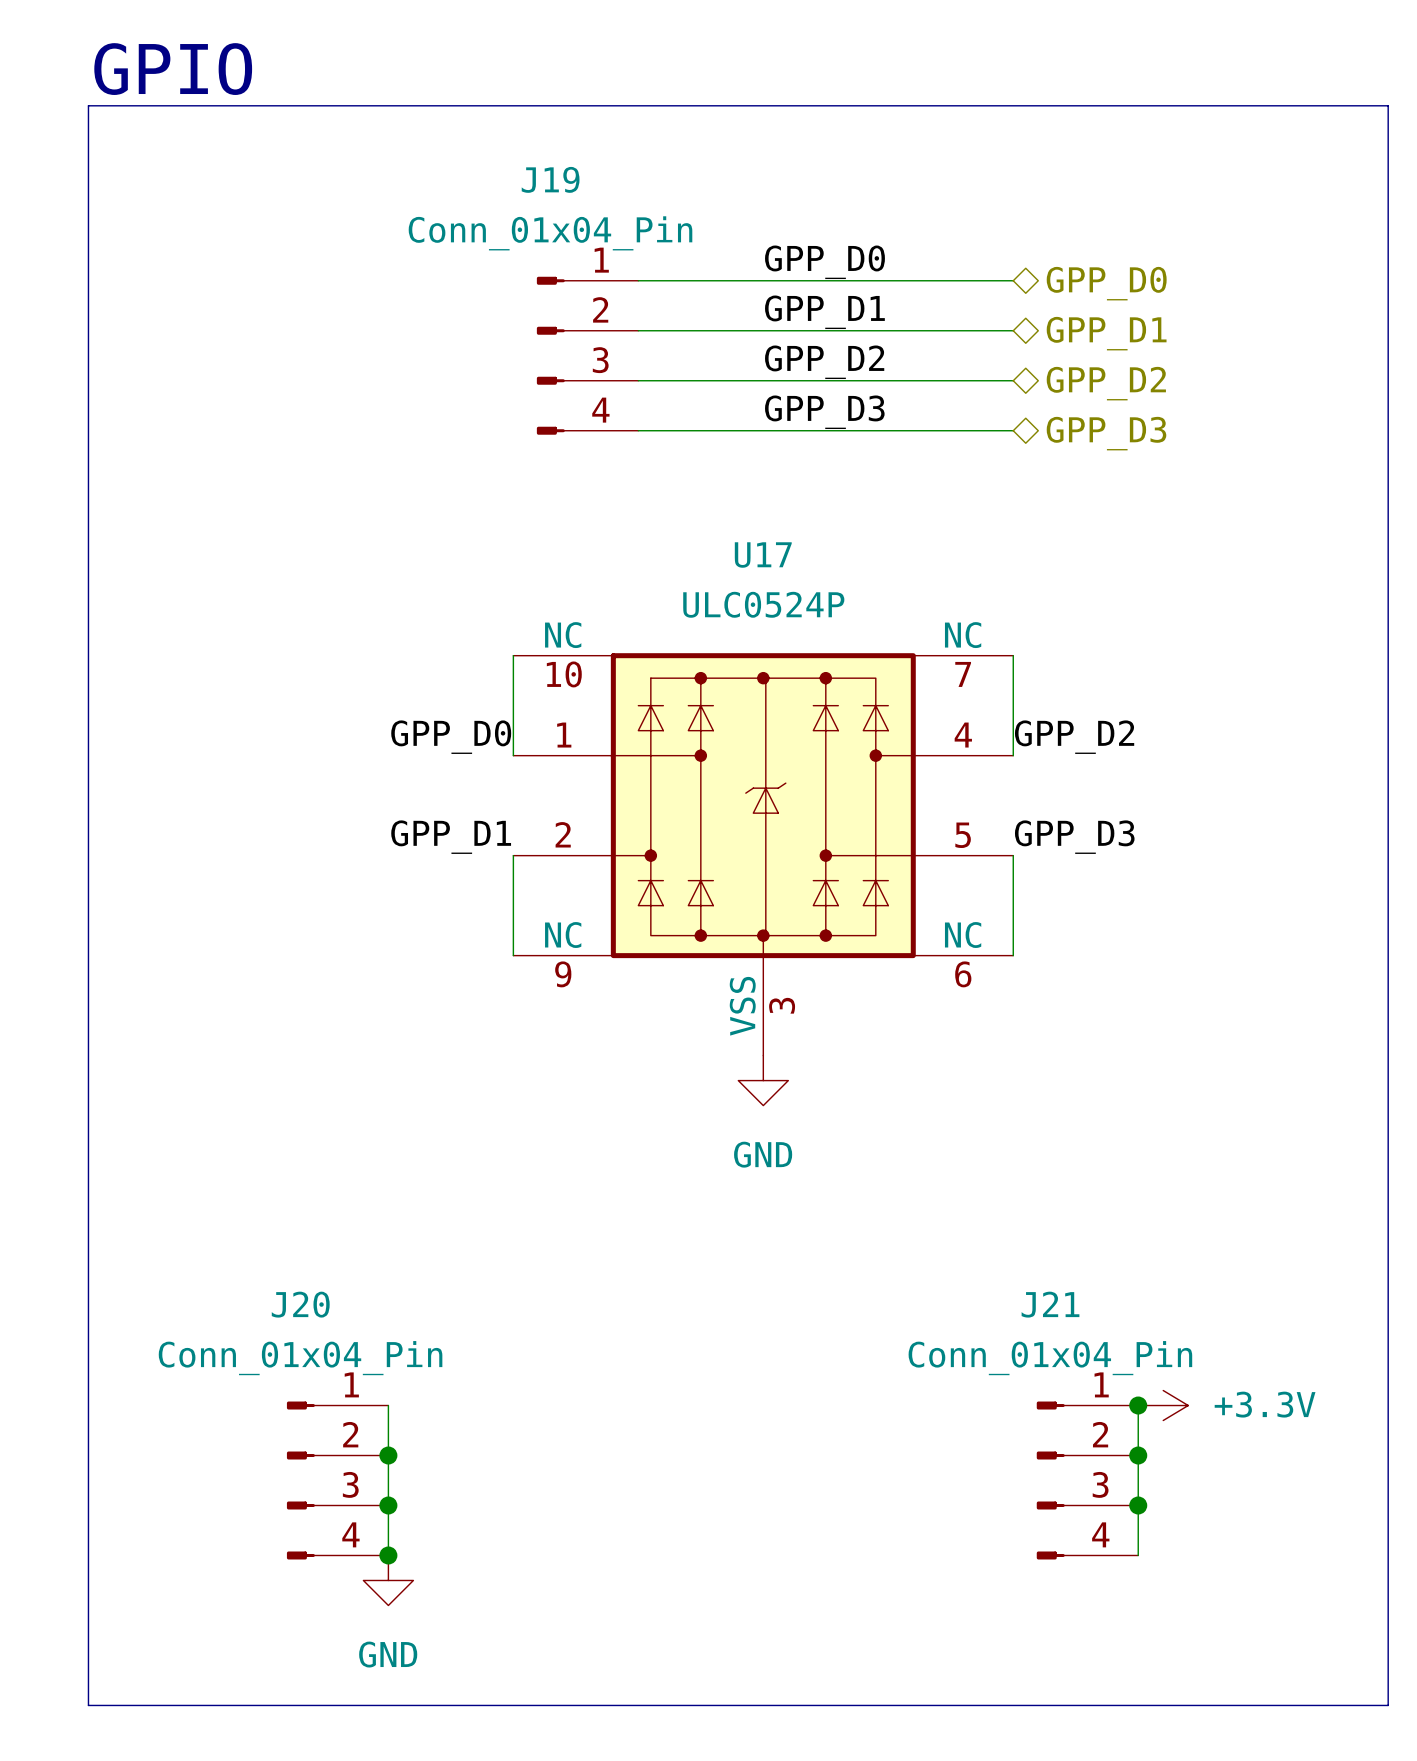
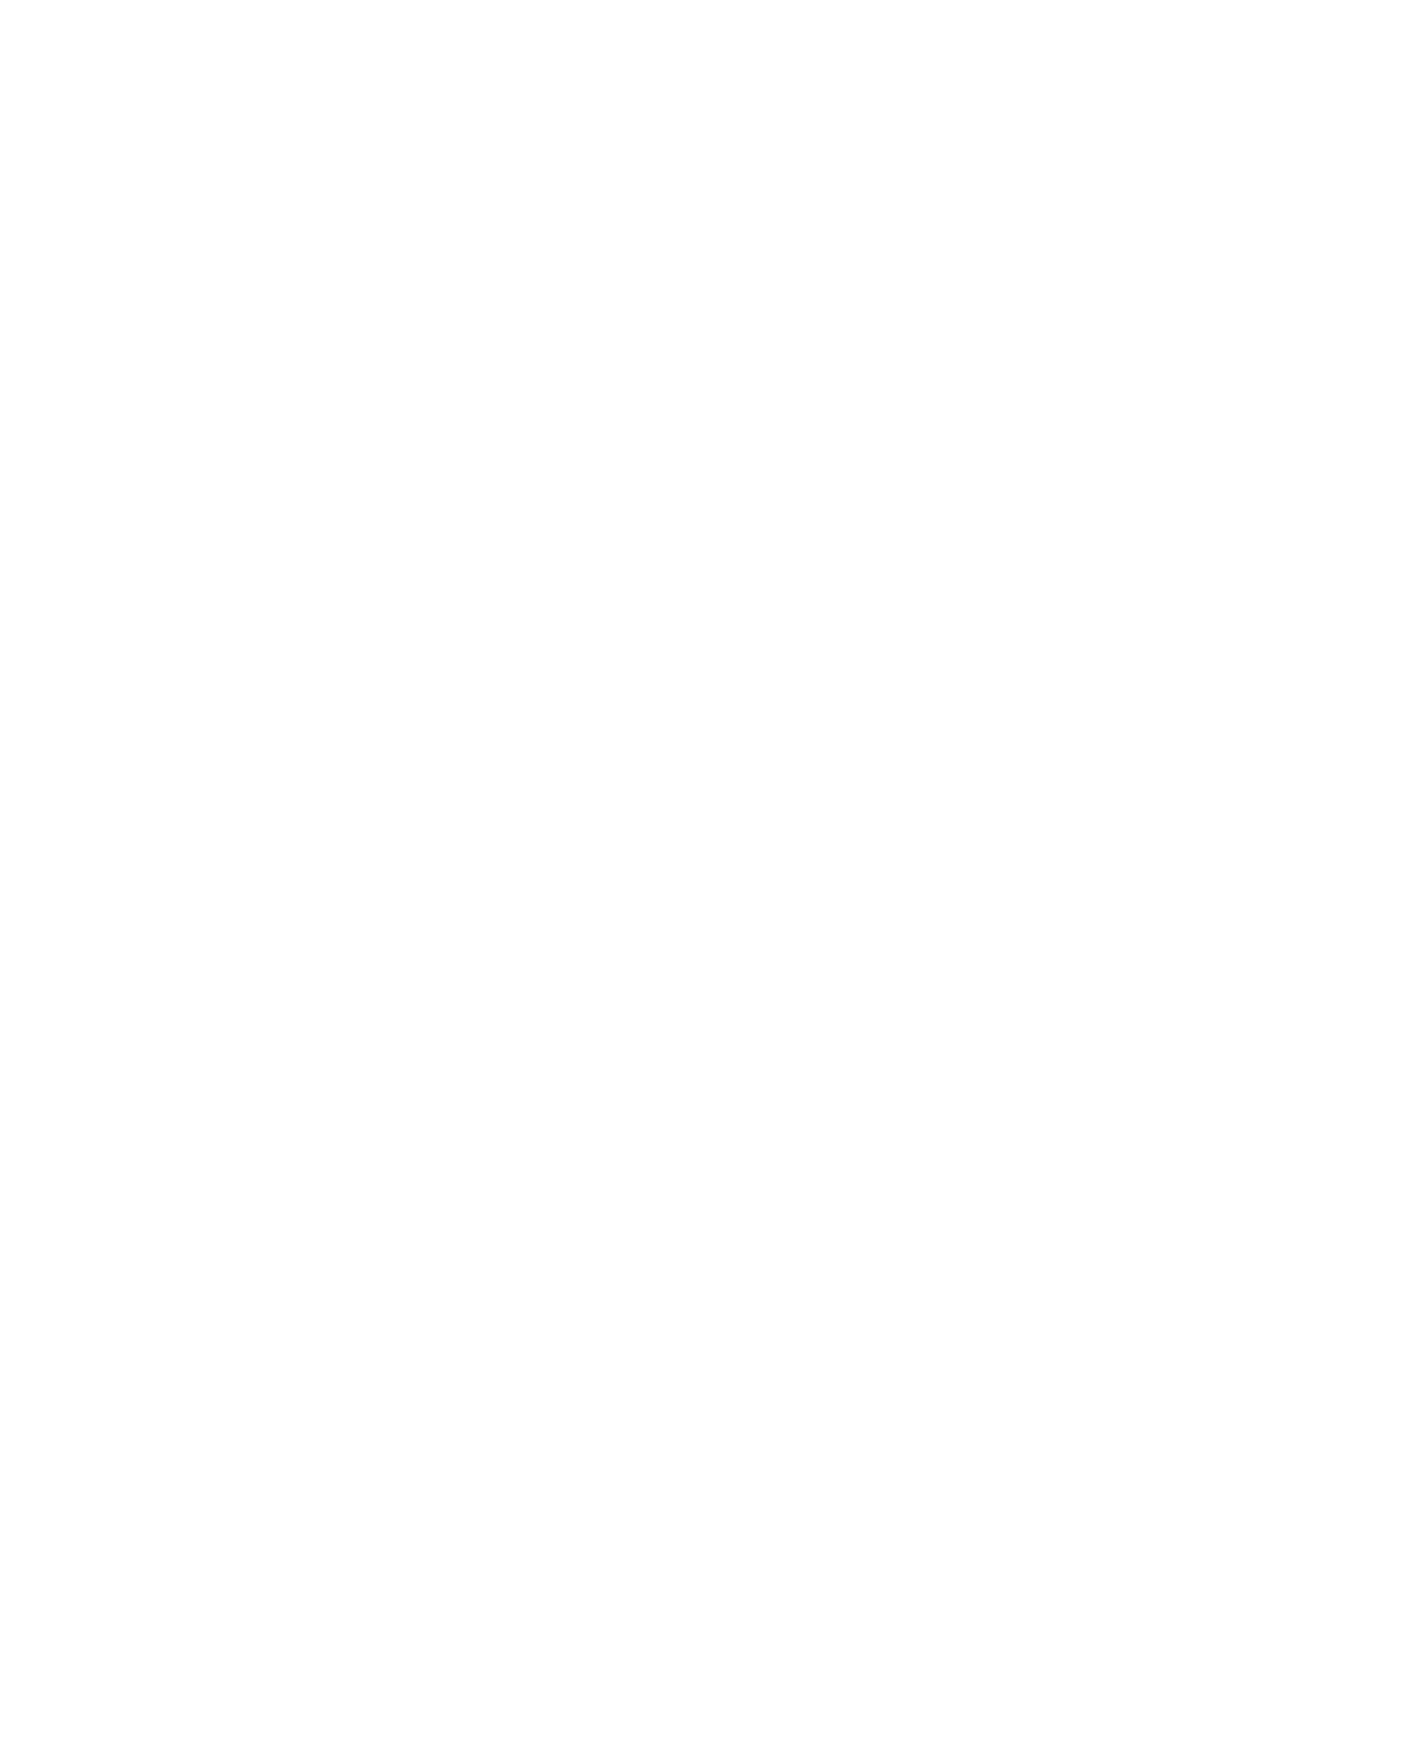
text: GPIO (173, 69) -> none
line: (88, 105) (1388, 105) (1388, 1705) (88, 1705) (88, 105) -> none
label: GPP_D0 (824, 262) -> none
wire: (638, 280) (1013, 280) -> none
hierarchical label: GPP_D0 (1106, 283) -> none
label: GPP_D1 (824, 312) -> none
wire: (638, 330) (1013, 330) -> none
hierarchical label: GPP_D1 (1106, 333) -> none
J19: Conn_01x04_Pin (587, 355) -> none
label: GPP_D2 (824, 362) -> none
wire: (638, 380) (1013, 380) -> none
hierarchical label: GPP_D2 (1106, 383) -> none
label: GPP_D3 (824, 412) -> none
wire: (638, 430) (1013, 430) -> none
hierarchical label: GPP_D3 (1106, 433) -> none
wire: (513, 655) (513, 755) -> none
wire: (1013, 655) (1013, 755) -> none
label: GPP_D0 (451, 737) -> none
label: GPP_D2 (1074, 737) -> none
label: GPP_D1 (451, 837) -> none
label: GPP_D3 (1074, 837) -> none
U17: ULC0524P (763, 854) -> none
wire: (513, 855) (513, 955) -> none
wire: (1013, 855) (1013, 955) -> none
power symbol: GND (763, 1080) -> none
wire: (388, 1405) (388, 1555) -> none
wire: (1138, 1405) (1138, 1555) -> none
junction: (1138, 1405) -> none
power symbol: +3.3V (1163, 1405) -> none
junction: (388, 1455) -> none
junction: (1138, 1455) -> none
J20: Conn_01x04_Pin (337, 1480) -> none
J21: Conn_01x04_Pin (1087, 1480) -> none
junction: (388, 1505) -> none
junction: (1138, 1505) -> none
junction: (388, 1555) -> none
power symbol: GND (388, 1580) -> none

